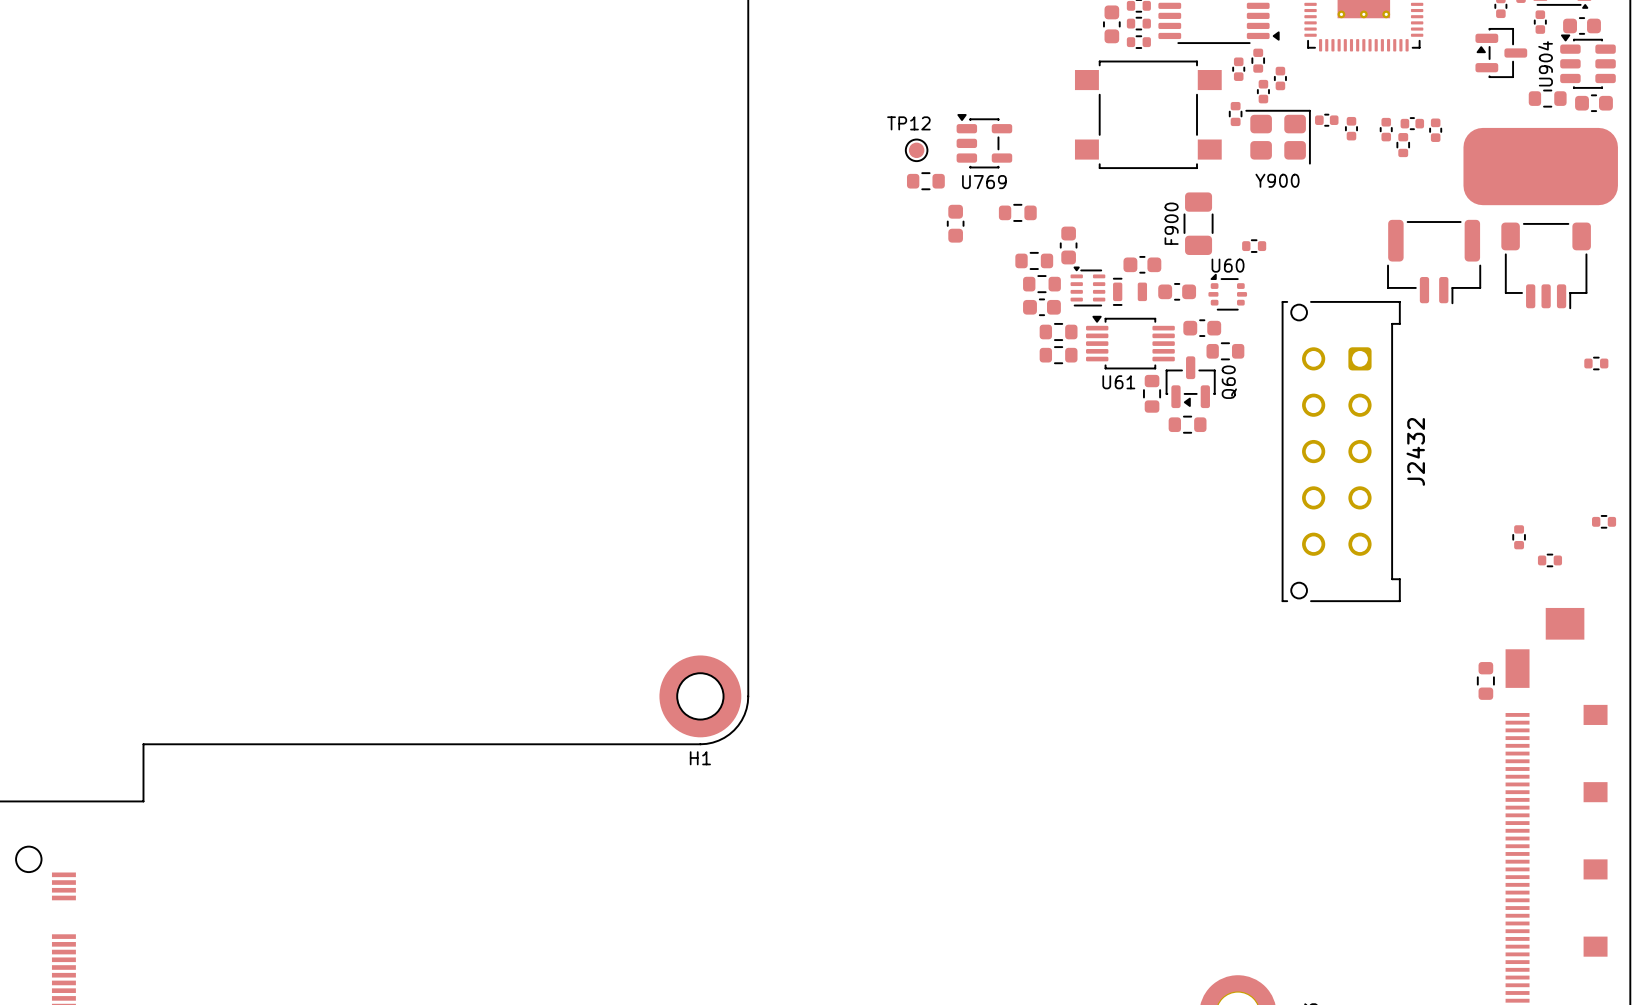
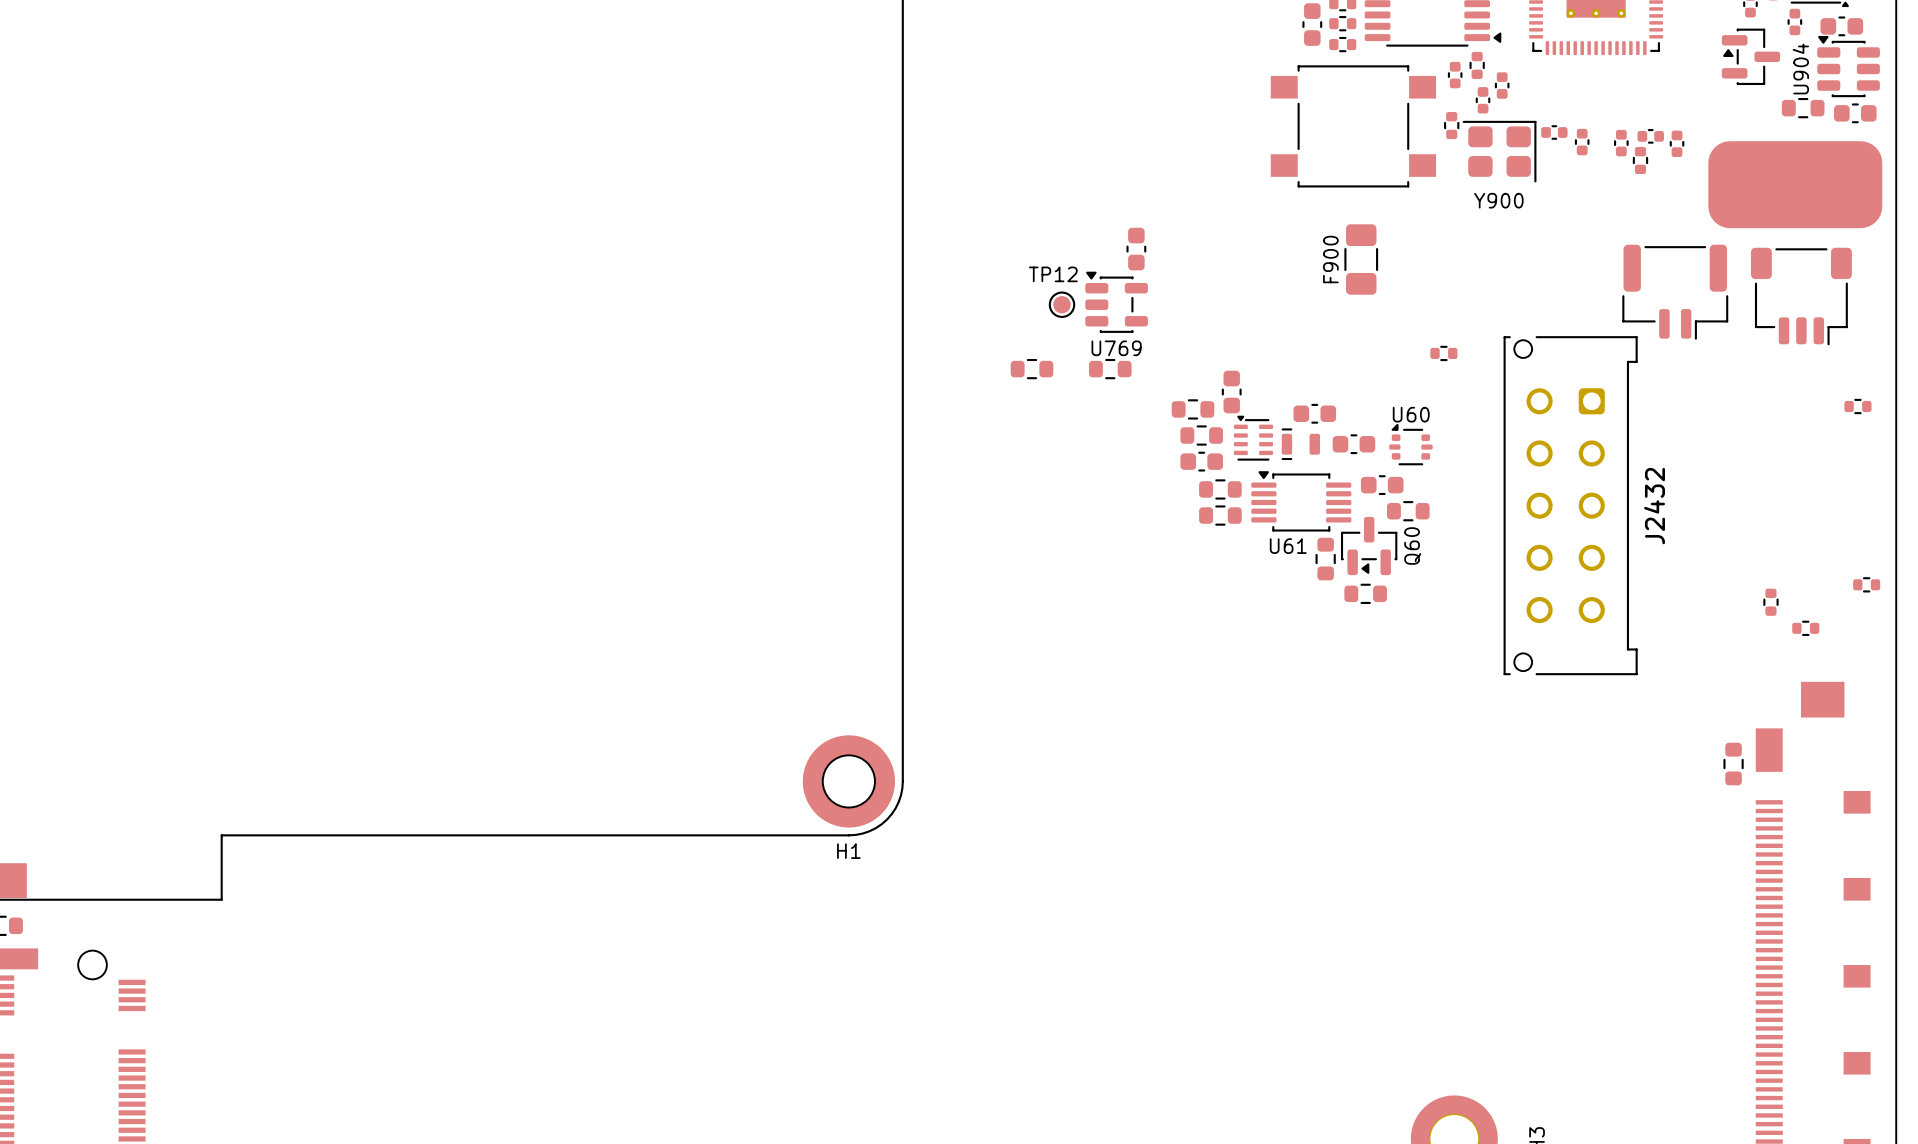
U769 position: (984, 141) -> (1116, 302)
TP12 position: (916, 150) -> (1062, 304)
part: (925, 181) -> none
part: (1017, 212) -> none
F900 position: (1198, 223) -> (1361, 259)
part: (1068, 245) -> none
part position: (1254, 246) -> (1443, 353)
part: (1034, 260) -> none
part: (1142, 264) -> none
part: (1041, 284) -> none
part position: (1087, 286) -> (1253, 438)
part position: (1129, 291) -> (1300, 444)
part: (1177, 291) -> none
U60 position: (1227, 292) -> (1410, 444)
part rotation: 0° (1041, 307) -> 90° clockwise (1231, 392)
part position: (1041, 307) -> (1231, 392)
part: (1202, 328) -> none
part: none -> (1031, 369)
part: none -> (1110, 369)
part: (1058, 332) -> none
U61 position: (1130, 342) -> (1301, 501)
part: (1225, 351) -> none
part: (1058, 355) -> none
part: none -> (1193, 409)
part: none -> (1314, 413)
part footprint: [1143, 374, 1162, 413] -> [1332, 434, 1376, 455]
Q60 position: (1190, 382) -> (1369, 545)
part: none -> (1201, 435)
part: none -> (1201, 461)
part position: (1187, 424) -> (1408, 511)
part: none -> (1382, 485)
part: none -> (1220, 489)
part: none -> (1220, 515)
part: none -> (1325, 559)
part: none -> (1365, 593)

